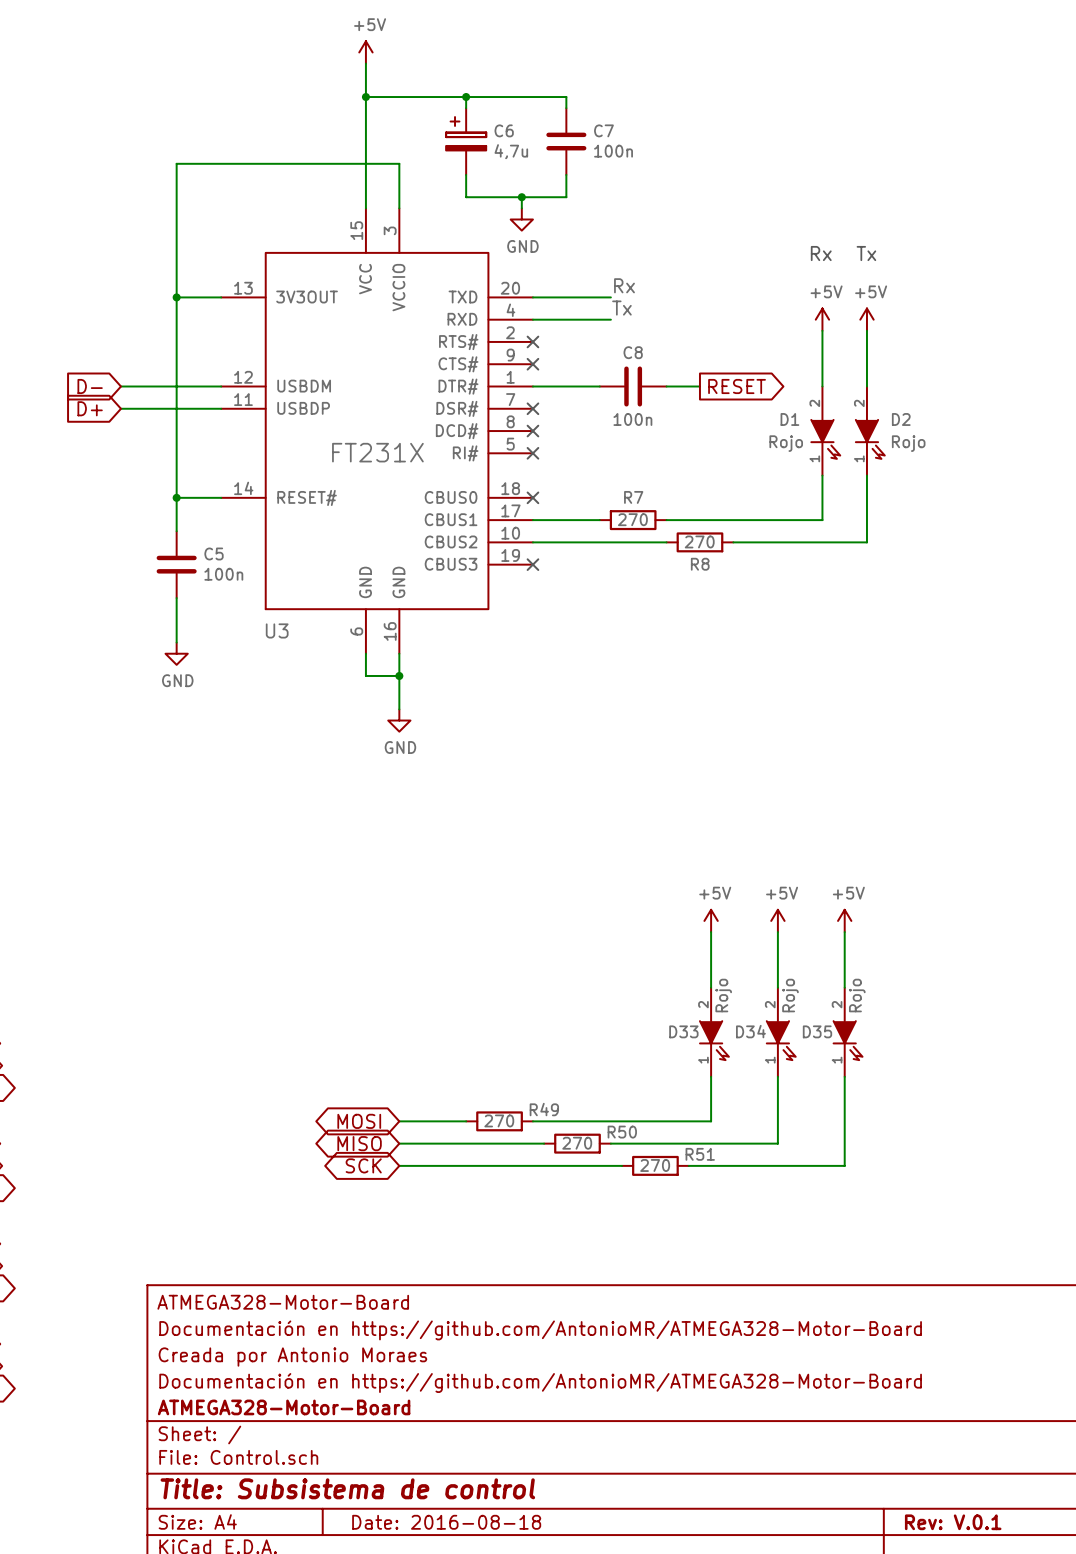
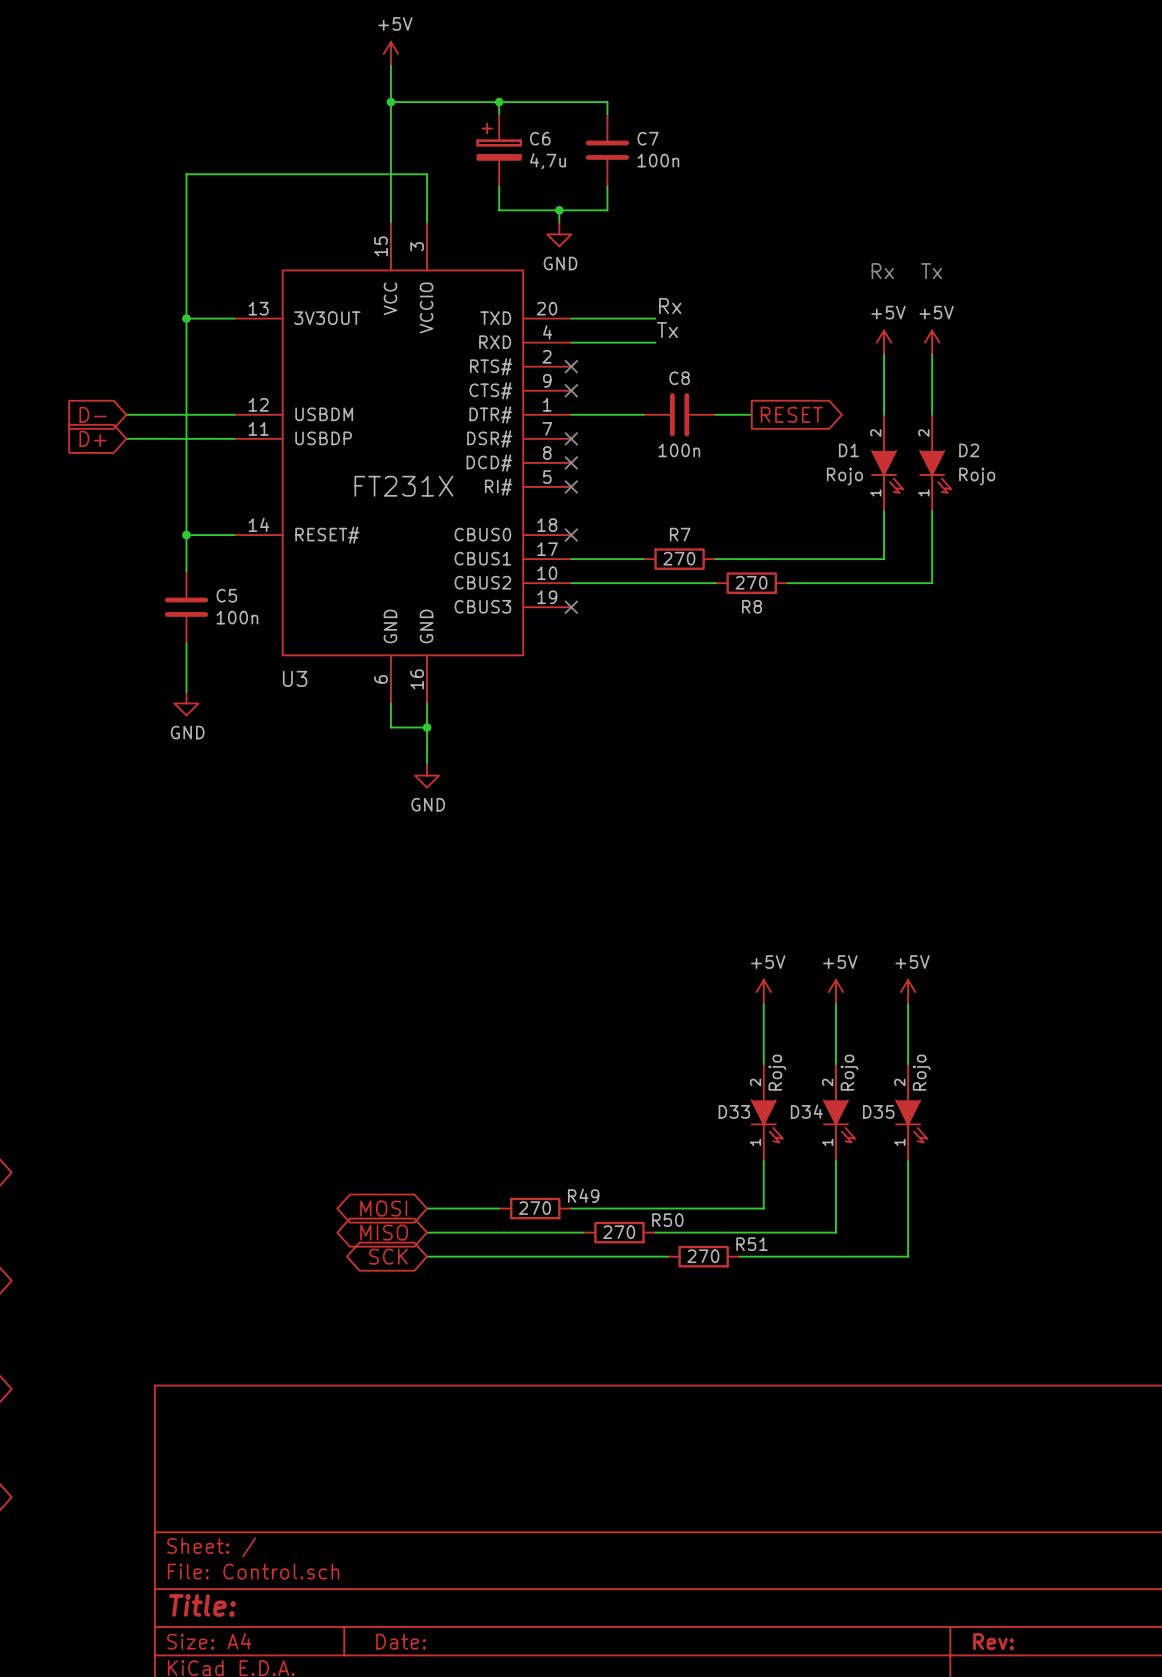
title block: ATMEGA328-Motor-Board (283, 1302) -> none
title block: Documentación en https://github.com/AntonioMR/ATMEGA328-Motor-Board (540, 1330) -> none
title block: Creada por Antonio Moraes (292, 1357) -> none
title block: Documentación en https://github.com/AntonioMR/ATMEGA328-Motor-Board (540, 1383) -> none
title block: ATMEGA328-Motor-Board (284, 1407) -> none
title block: Title: Subsistema de control (347, 1488) -> Title: (202, 1605)
title block: Date: 2016-08-18 (446, 1522) -> Date: (401, 1641)
title block: Rev: V.0.1 (953, 1522) -> Rev: (993, 1641)

